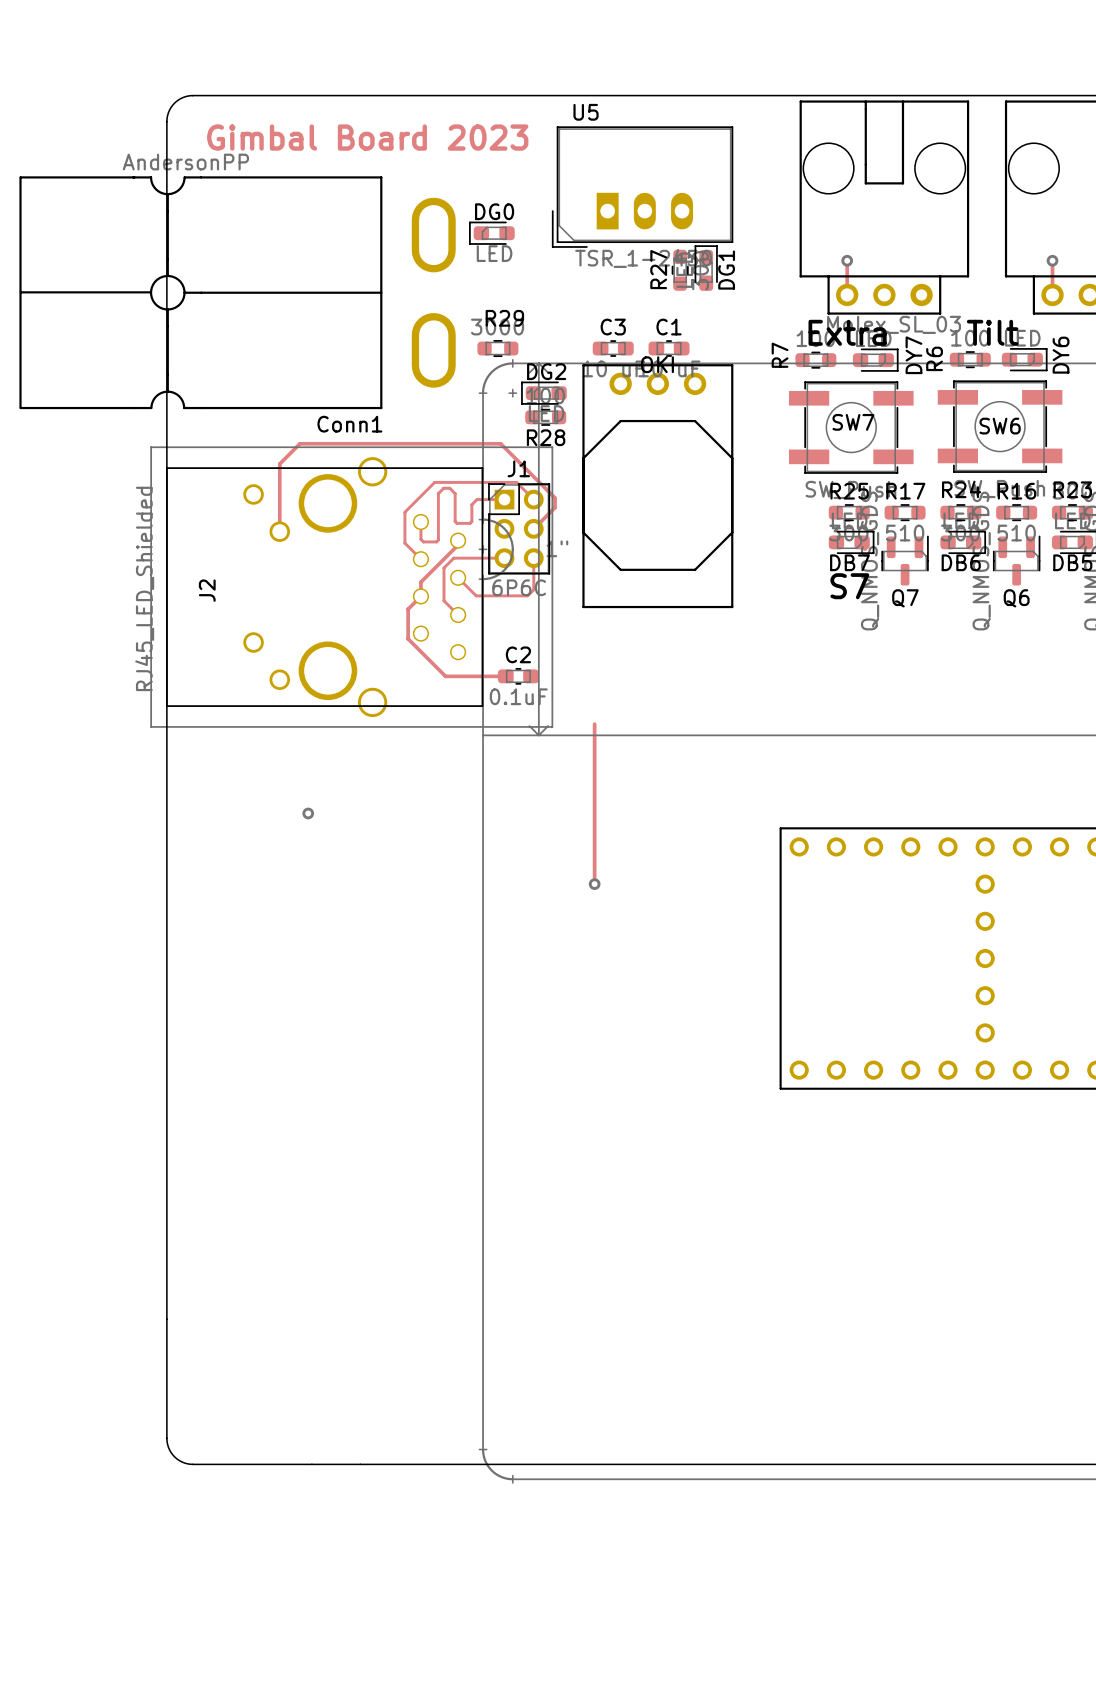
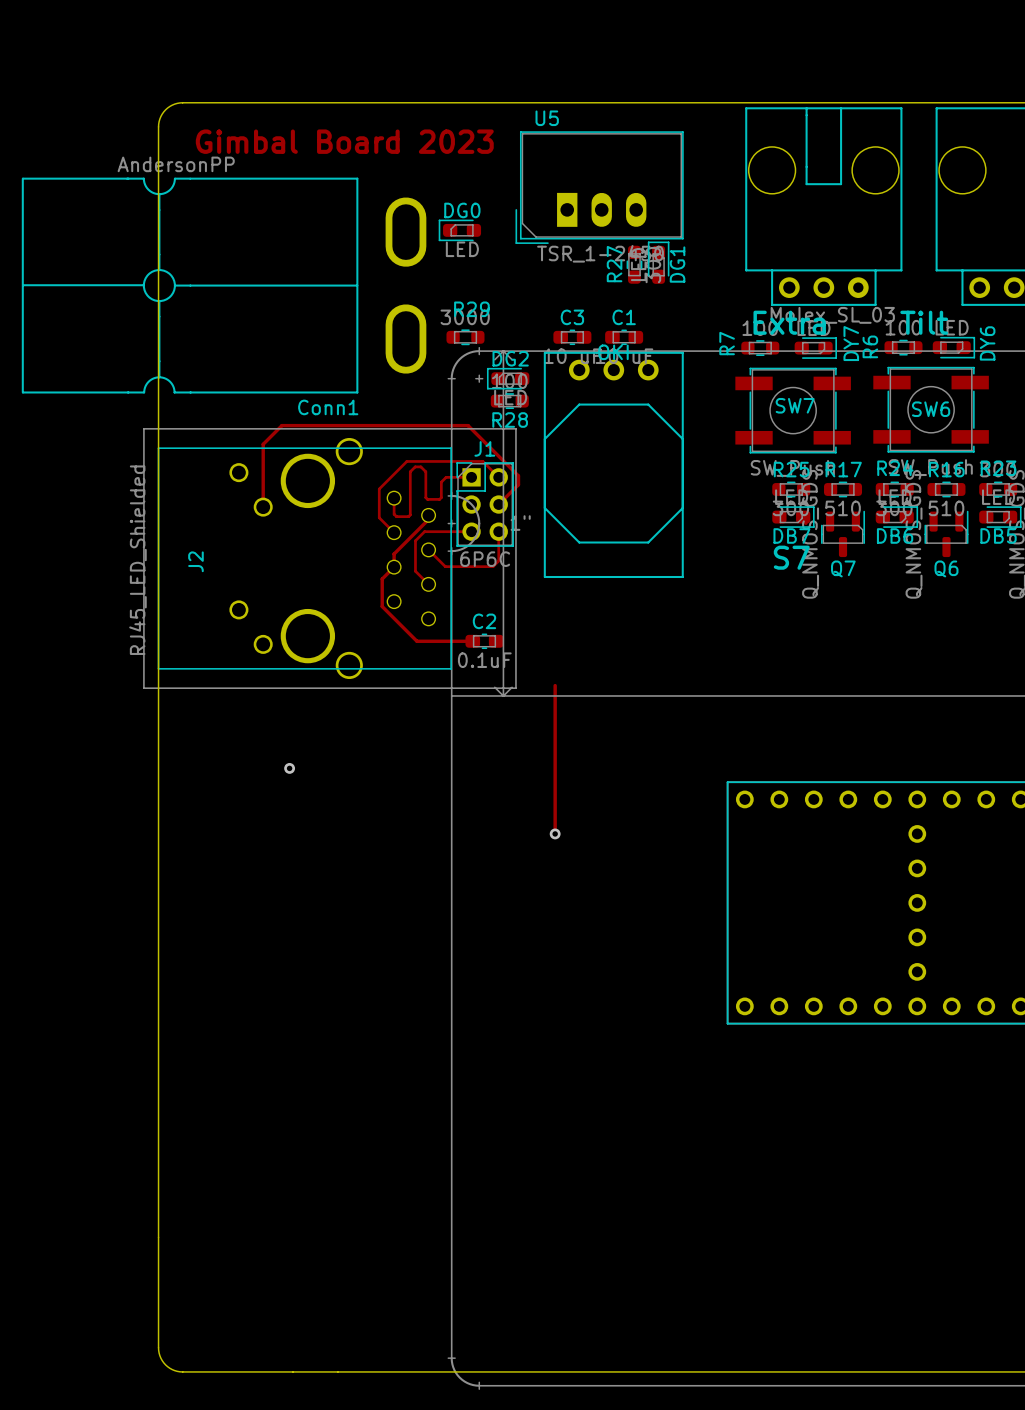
track: (847, 260) (847, 294) -> none
via: (847, 260) -> none
track: (1052, 260) (1052, 294) -> none
via: (1052, 260) -> none

